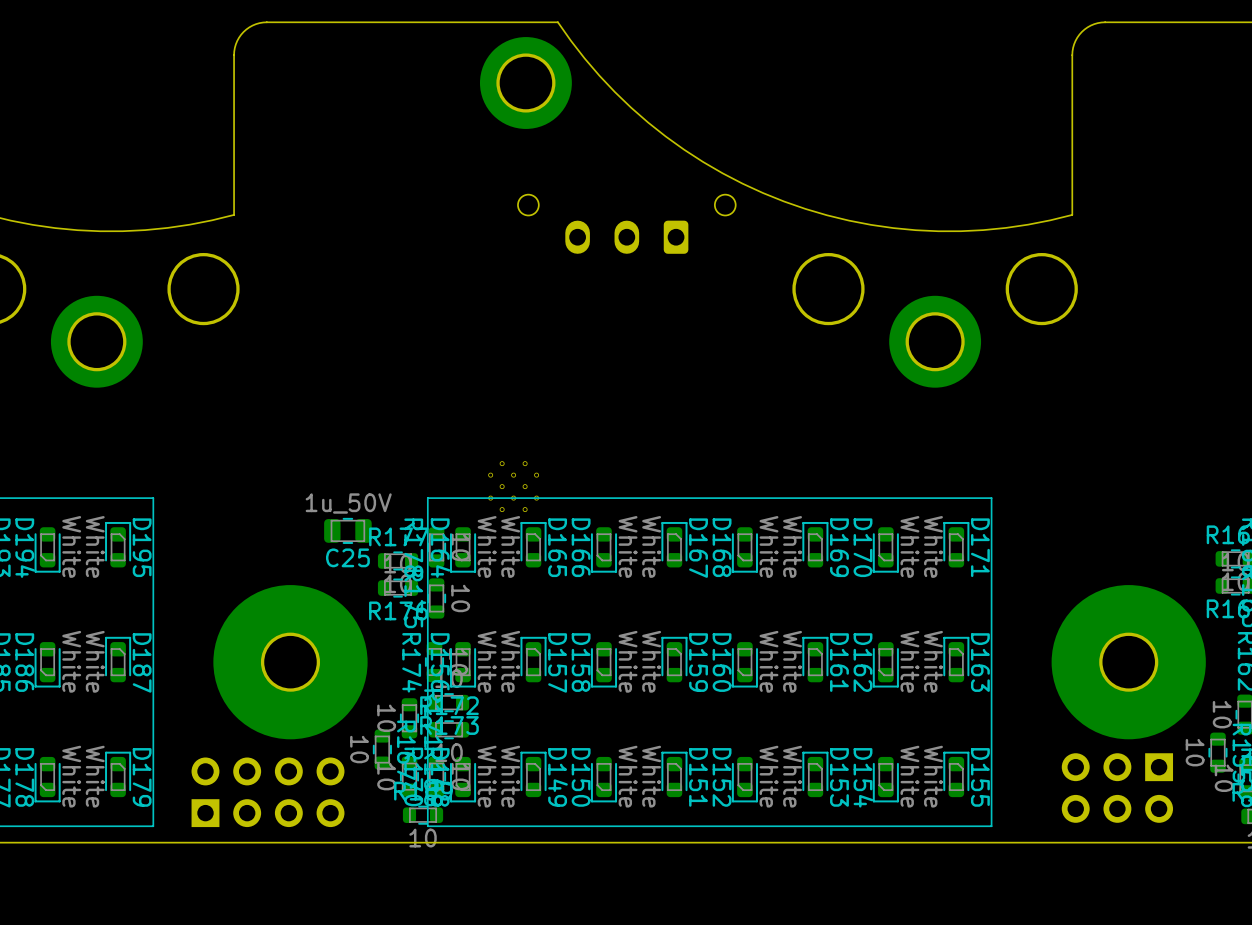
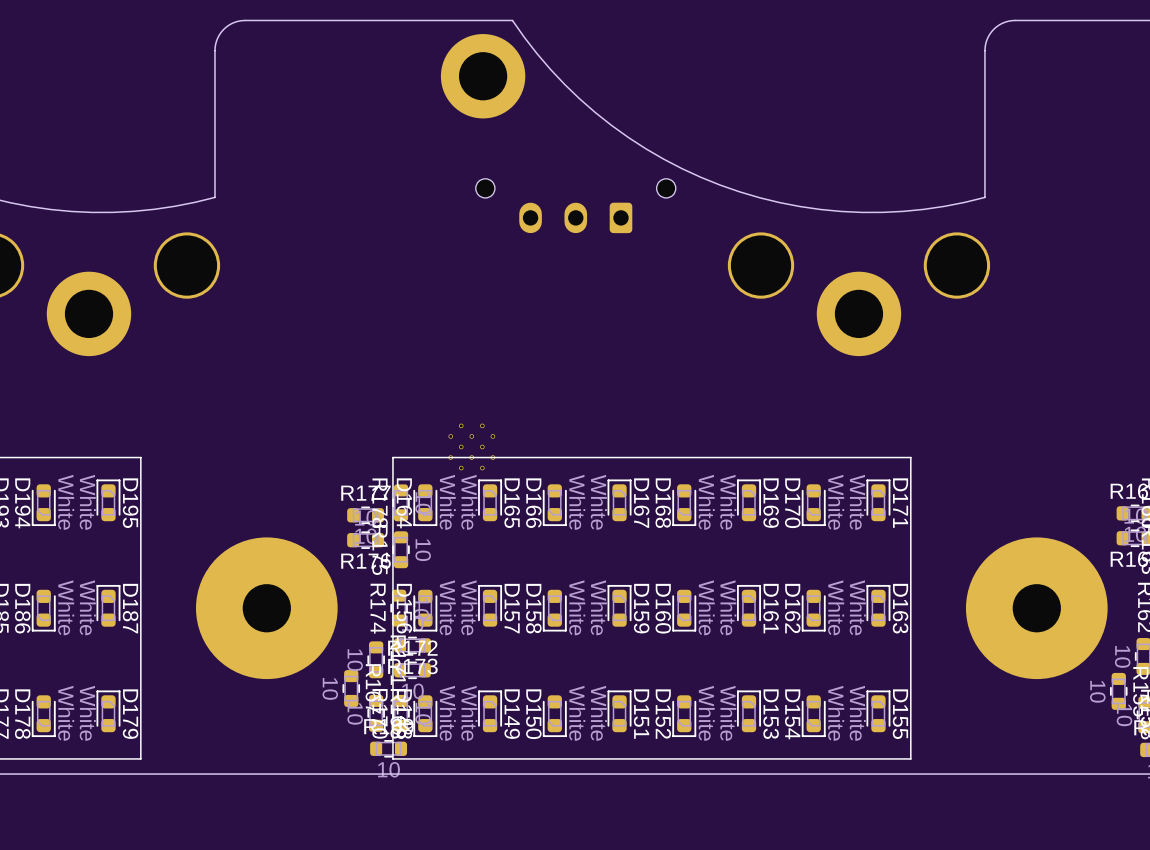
C25: 1u_50V (347, 530) -> none
part: (1117, 788) -> none
part: (268, 792) -> none

